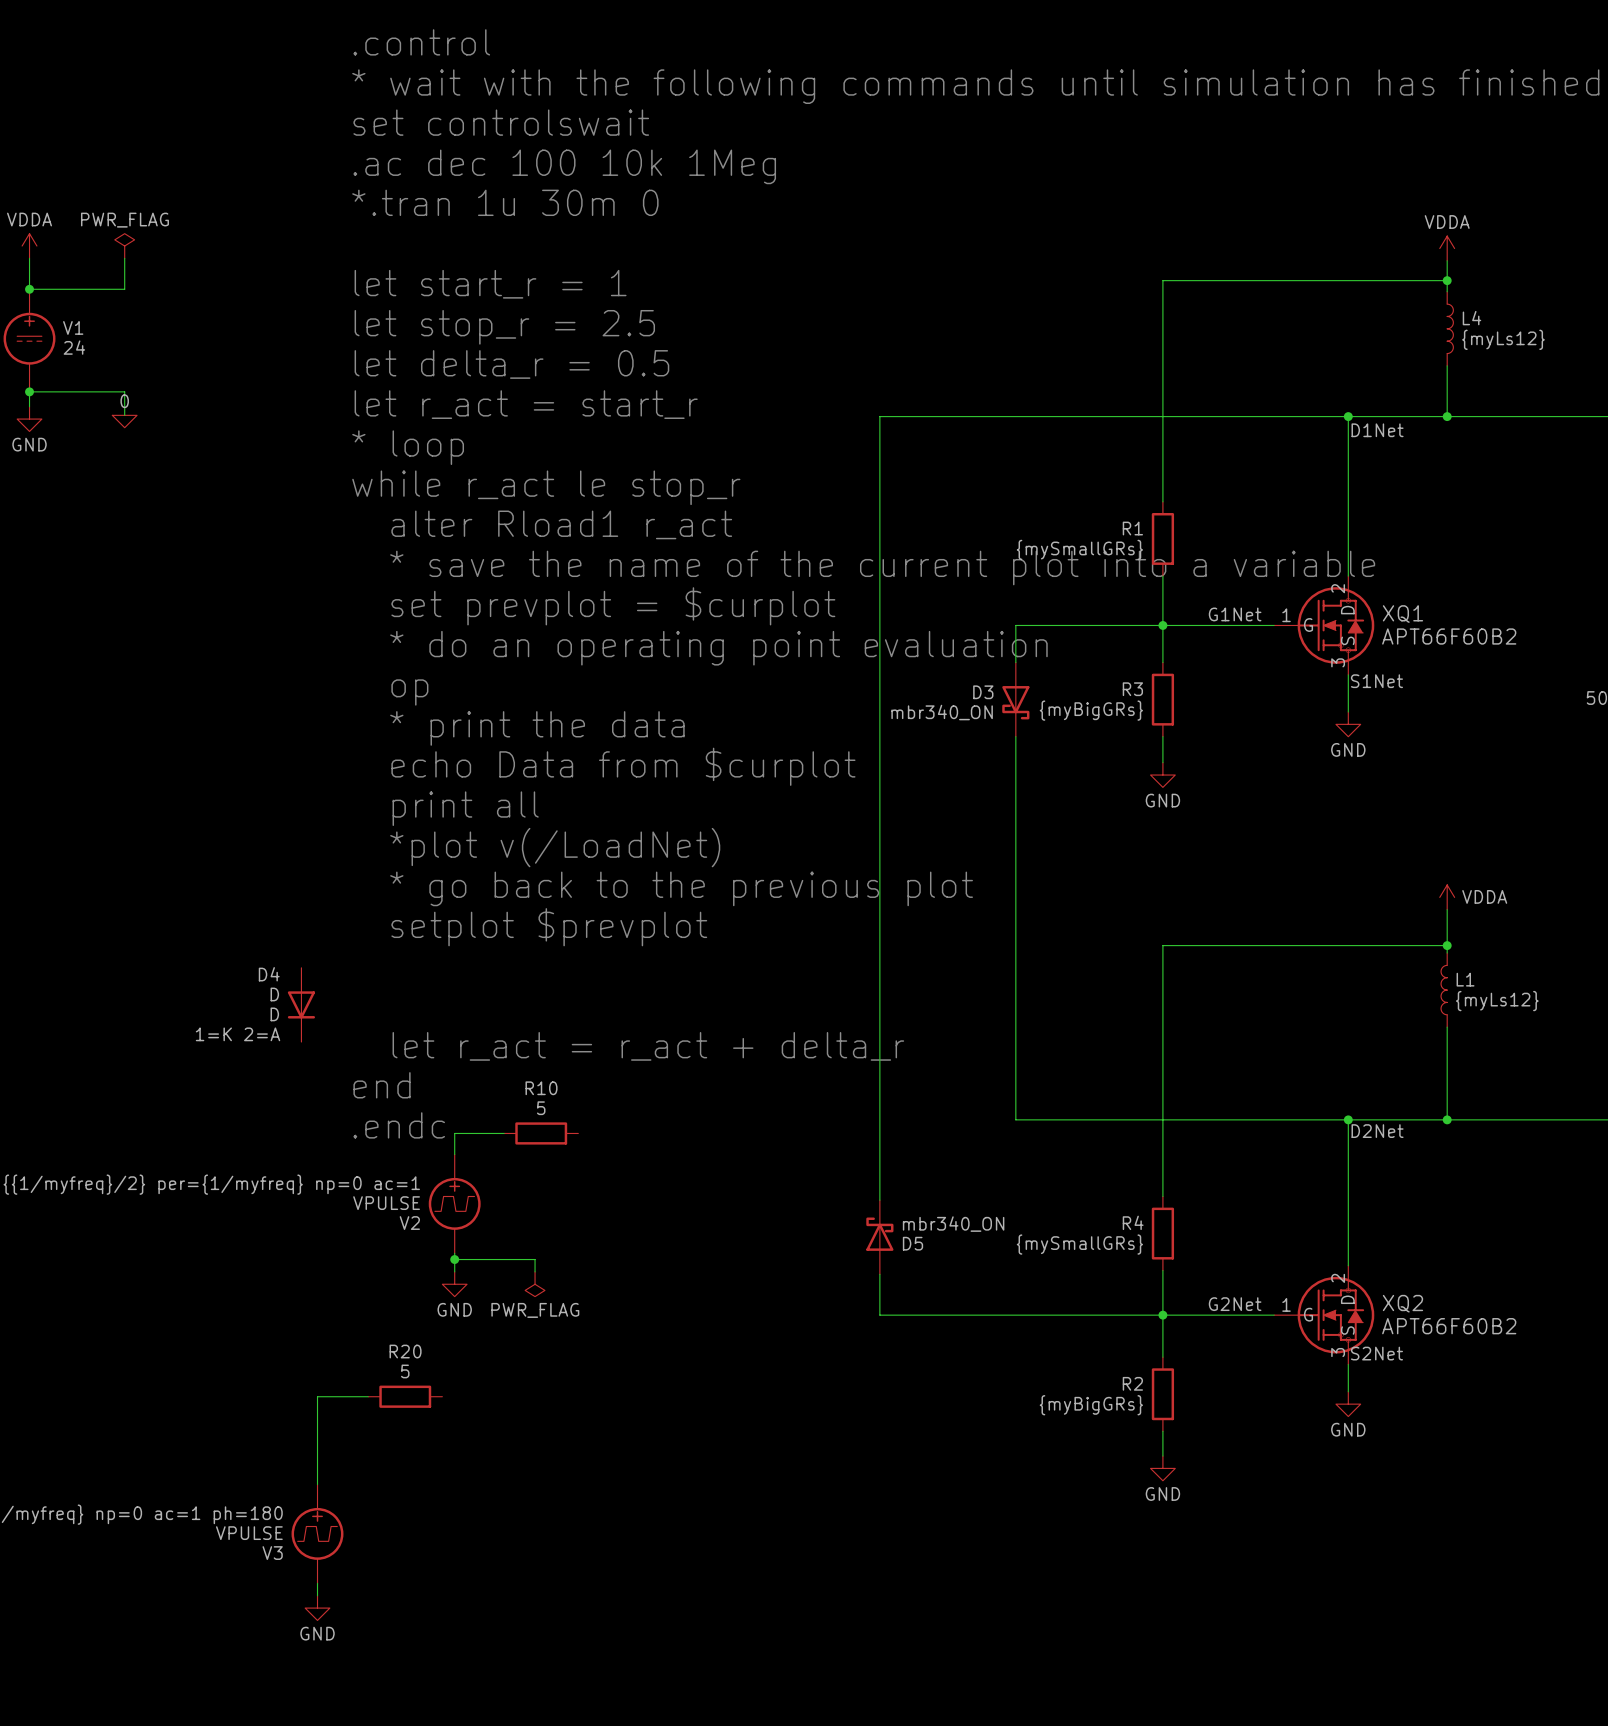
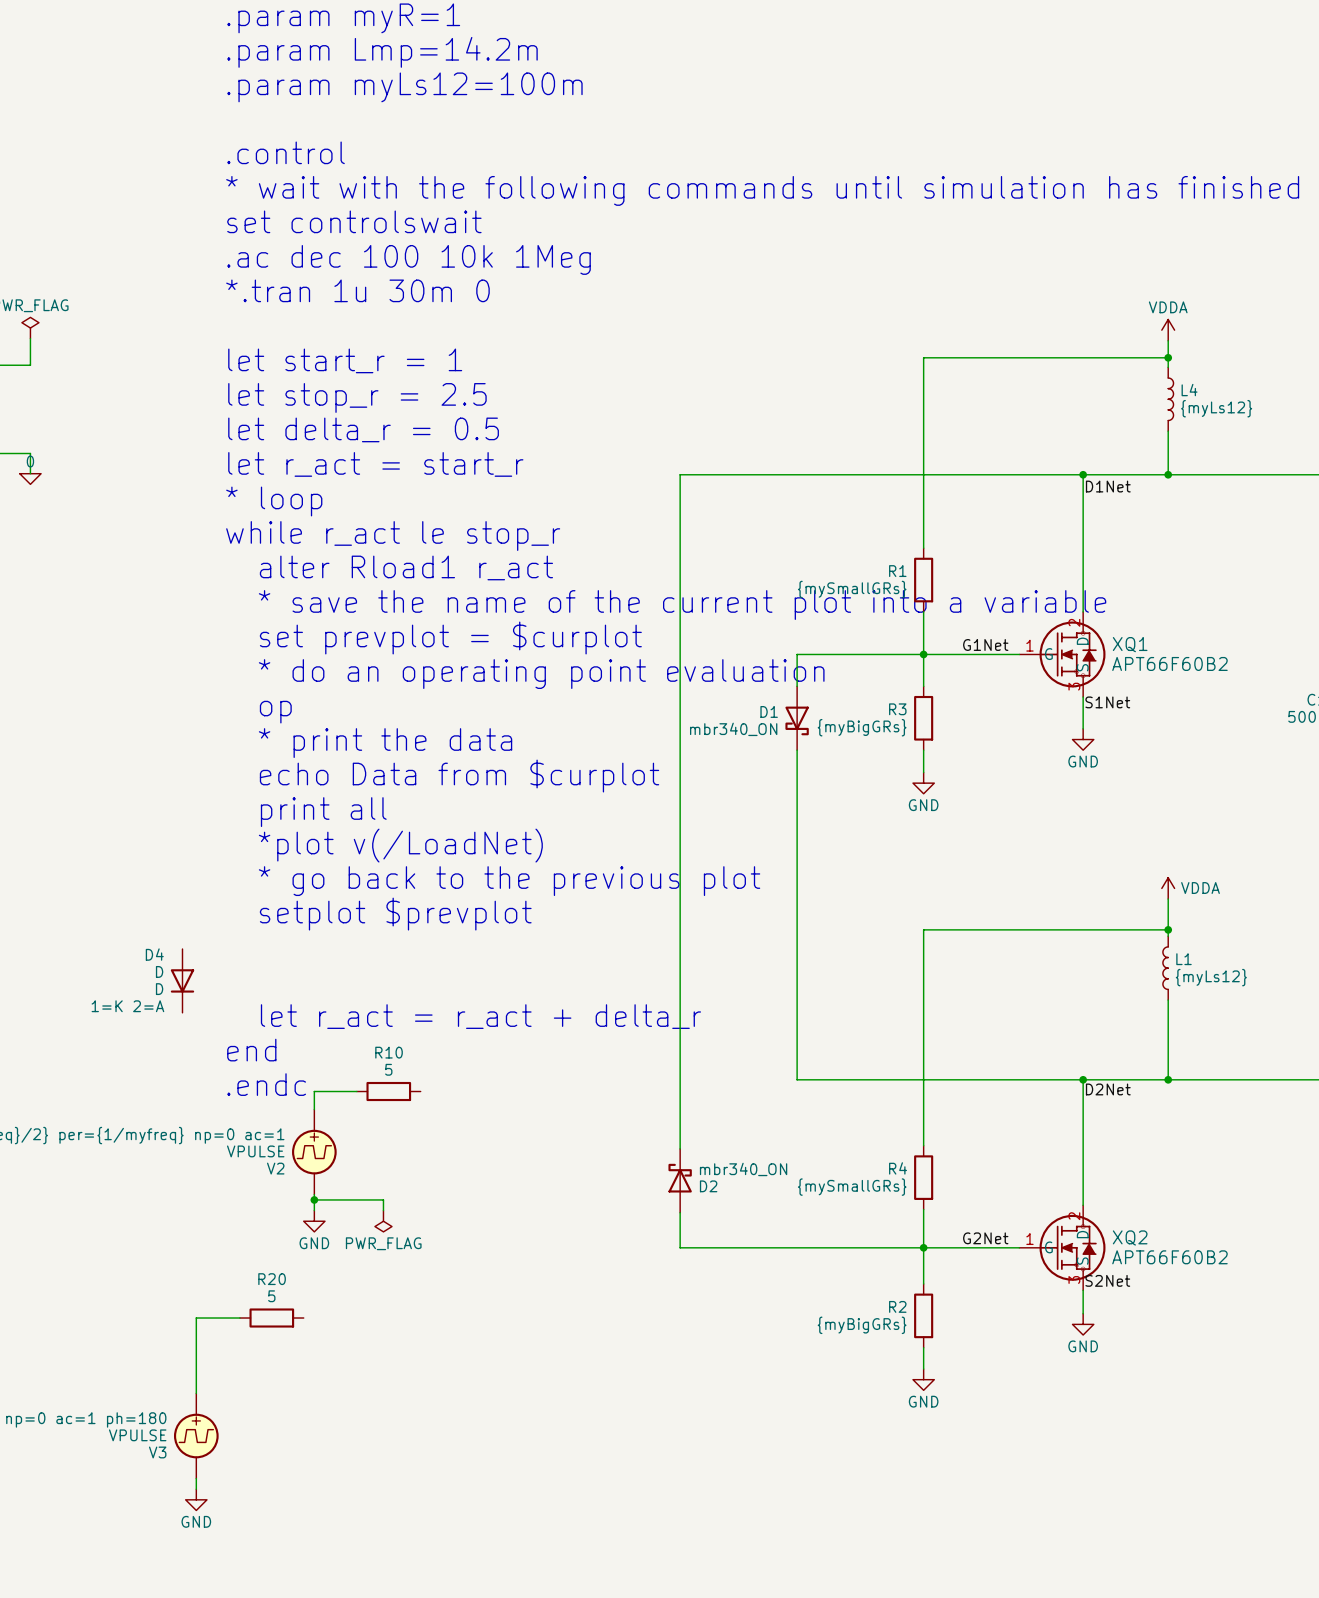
D3 name: D3 (983, 692) -> D1 (769, 711)
D5 name: D5 (912, 1243) -> D2 (708, 1186)

